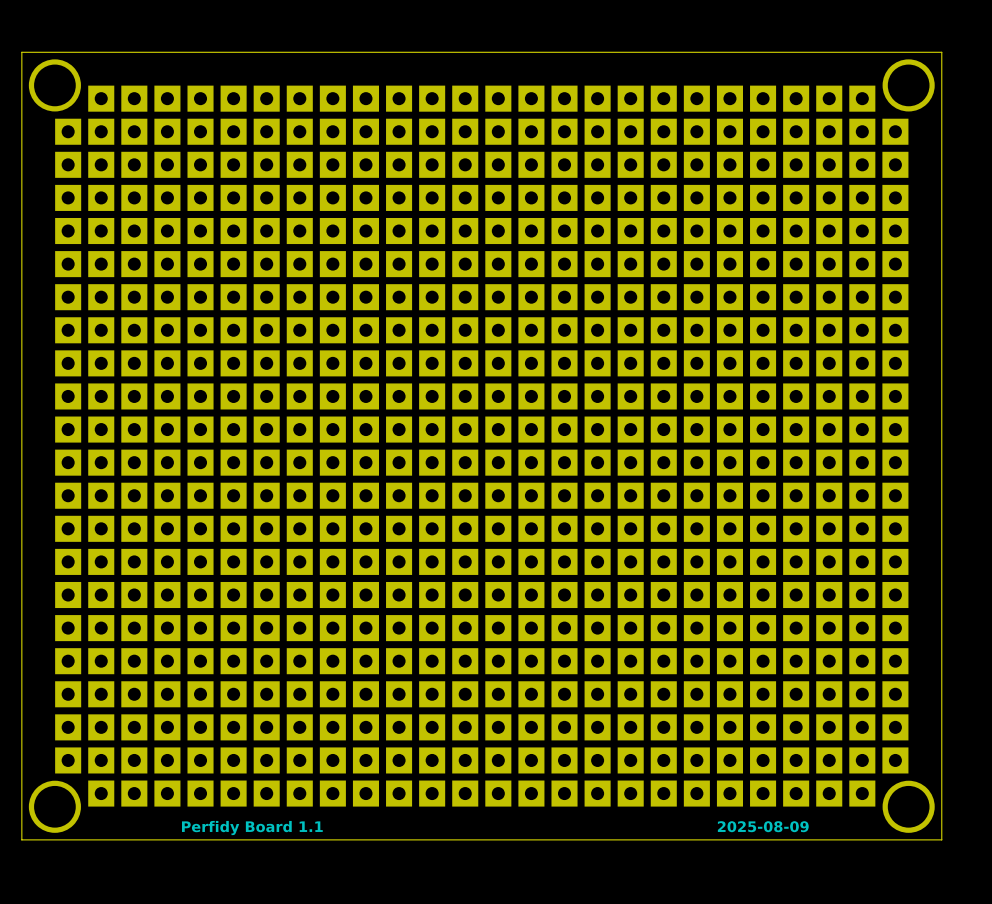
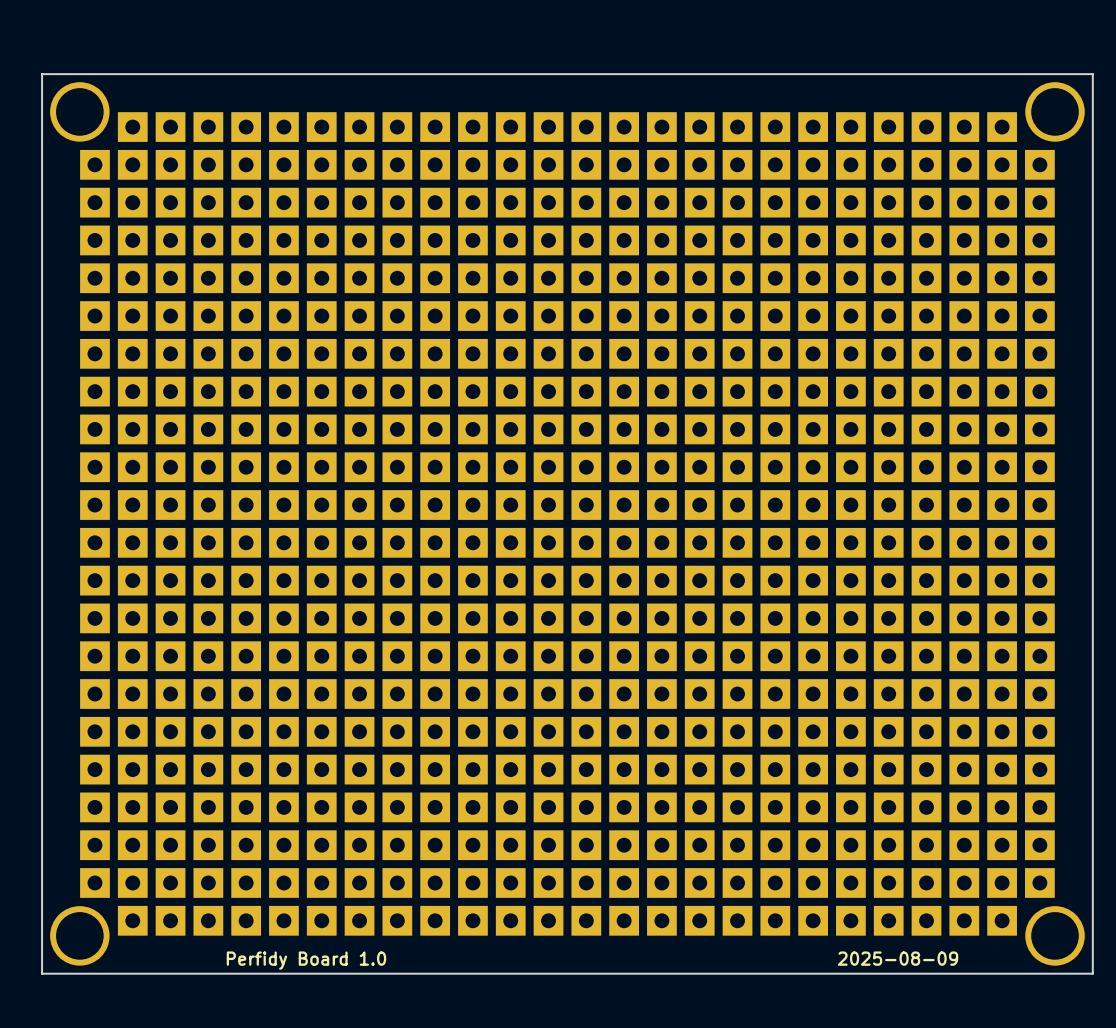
text: Perfidy Board 1.1 (252, 828) -> Perfidy Board 1.0 (306, 960)

